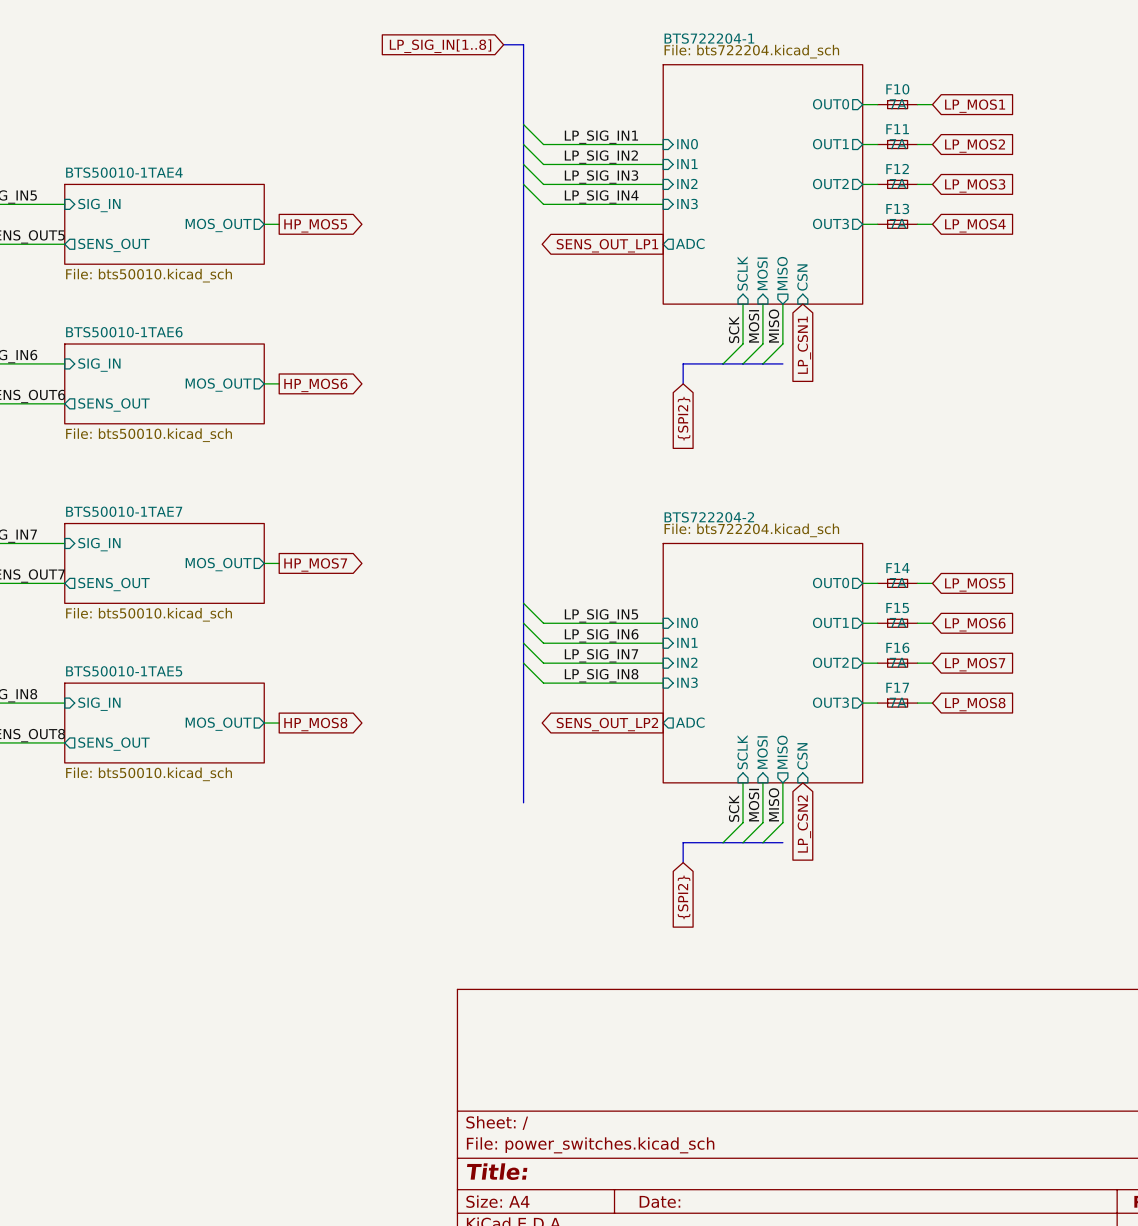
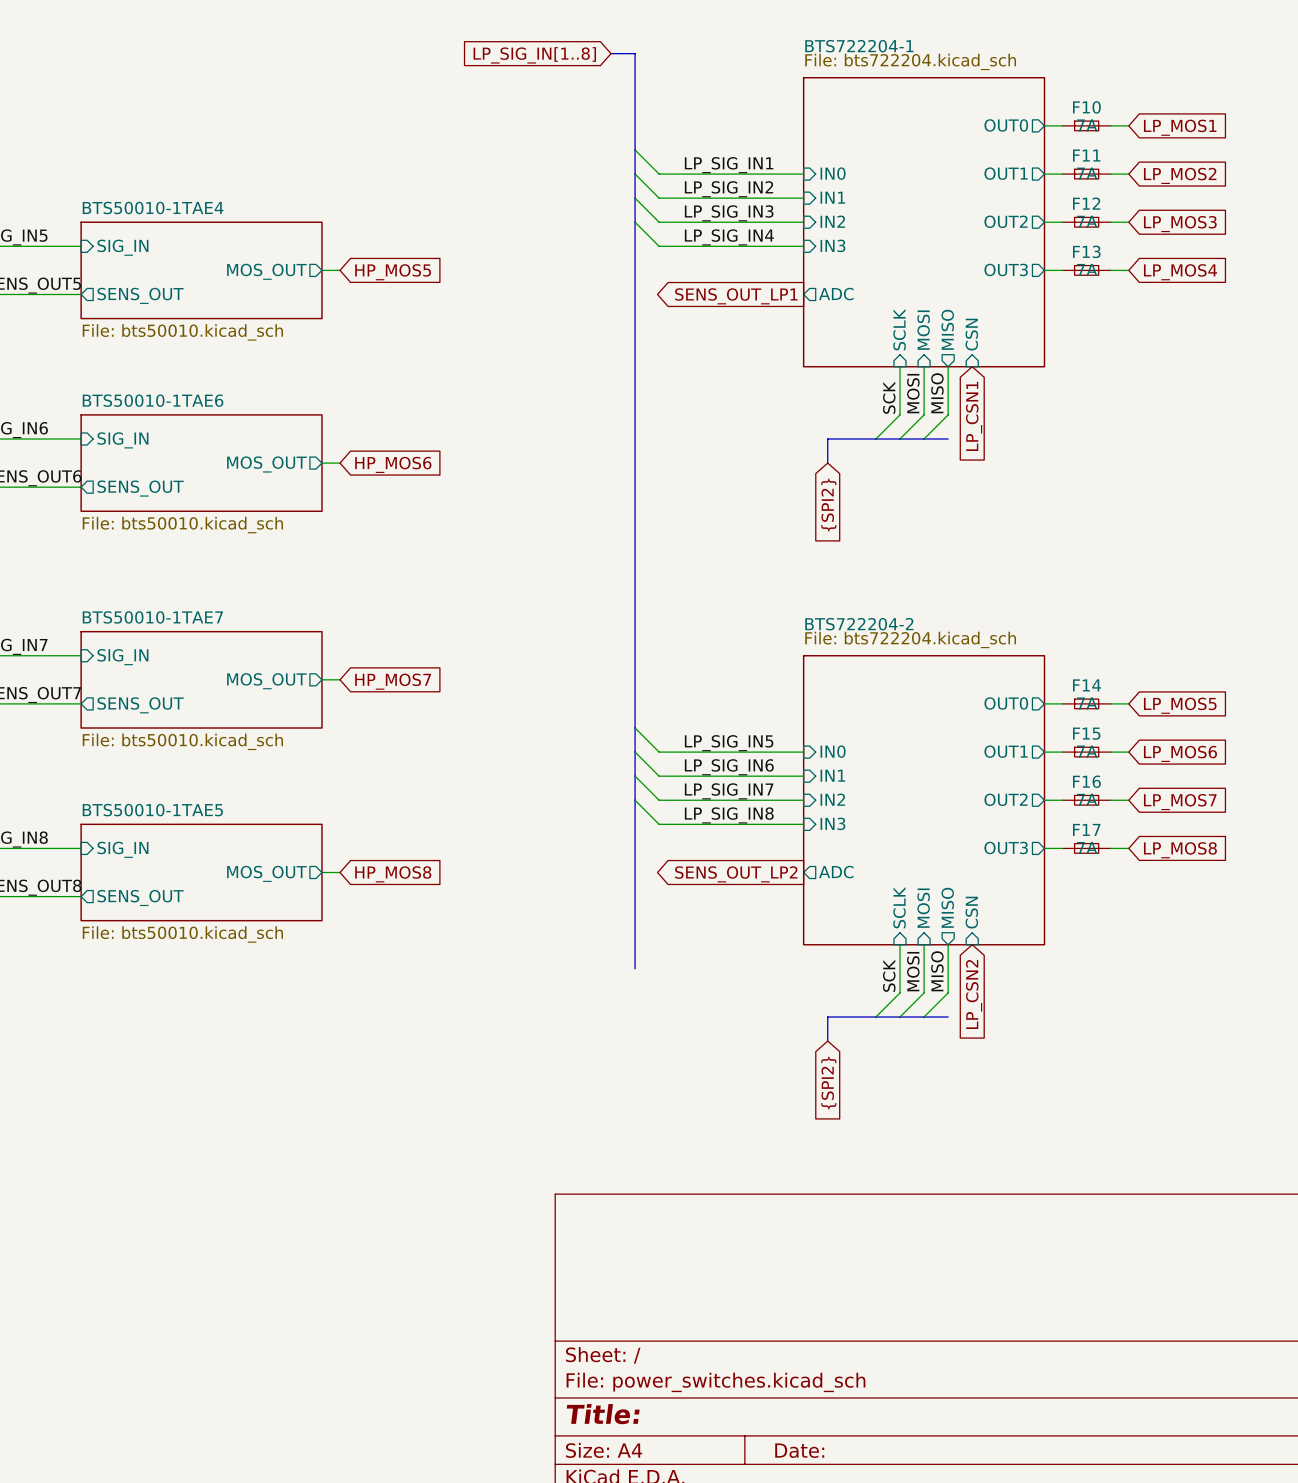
global label shape: output (315, 225) -> input (393, 272)
global label shape: output (315, 385) -> input (393, 464)
global label shape: output (315, 564) -> input (393, 681)
global label shape: output (315, 724) -> input (393, 874)

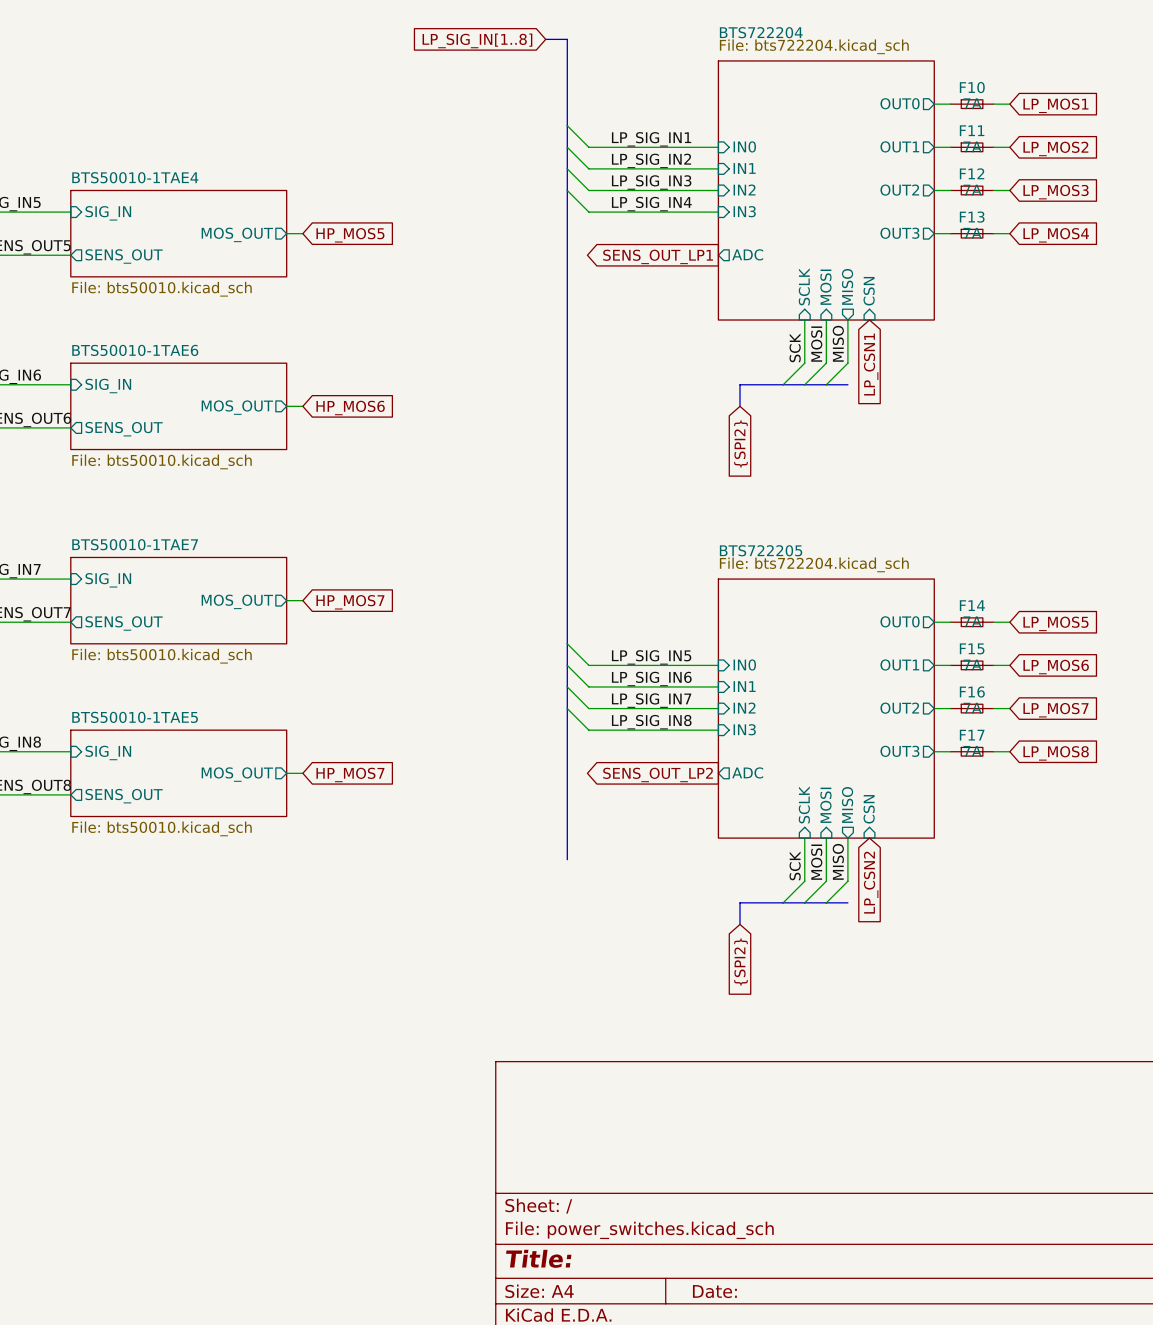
sheet BTS722204-1 name: BTS722204-1 (859, 46) -> BTS722204 (761, 32)
sheet BTS722204-2 name: BTS722204-2 (859, 624) -> BTS722205 (761, 550)
global label: HP_MOS8 (393, 874) -> HP_MOS7 (350, 774)

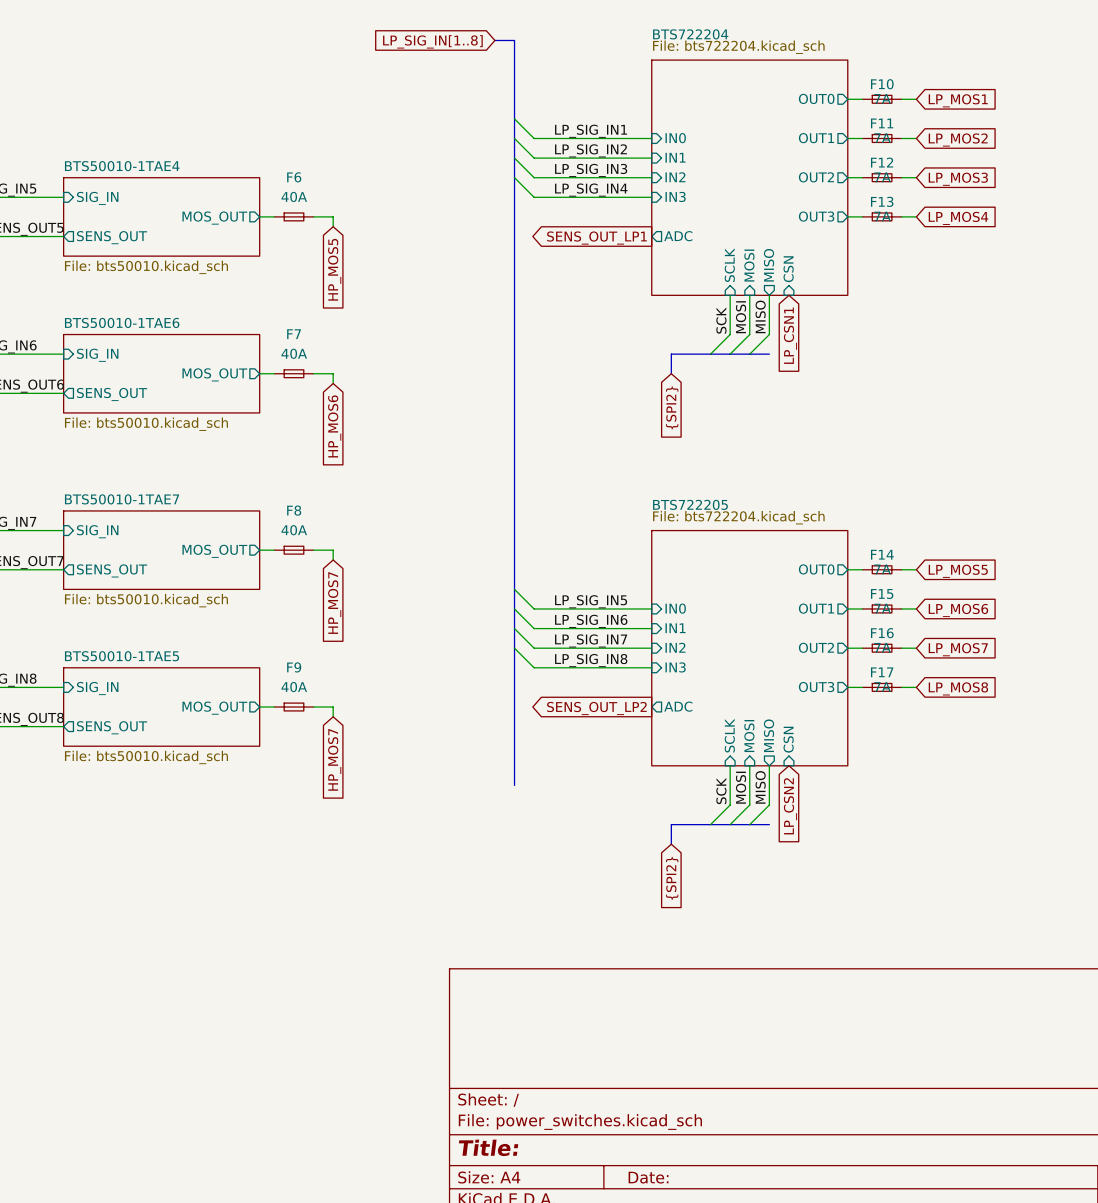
F6: none -> 40A (293, 216)
wire: none -> (313, 216) (333, 216) (333, 226)
global label rotation: 0° (350, 235) -> 90° clockwise (334, 269)
F7: none -> 40A (293, 373)
wire: none -> (313, 373) (333, 373) (333, 383)
global label rotation: 0° (350, 408) -> 90° clockwise (334, 426)
F8: none -> 40A (293, 550)
wire: none -> (313, 550) (333, 550) (333, 559)
global label rotation: 0° (350, 602) -> 90° clockwise (334, 603)
F9: none -> 40A (293, 707)
wire: none -> (313, 707) (333, 707) (333, 716)
global label rotation: 0° (350, 774) -> 90° clockwise (334, 759)

